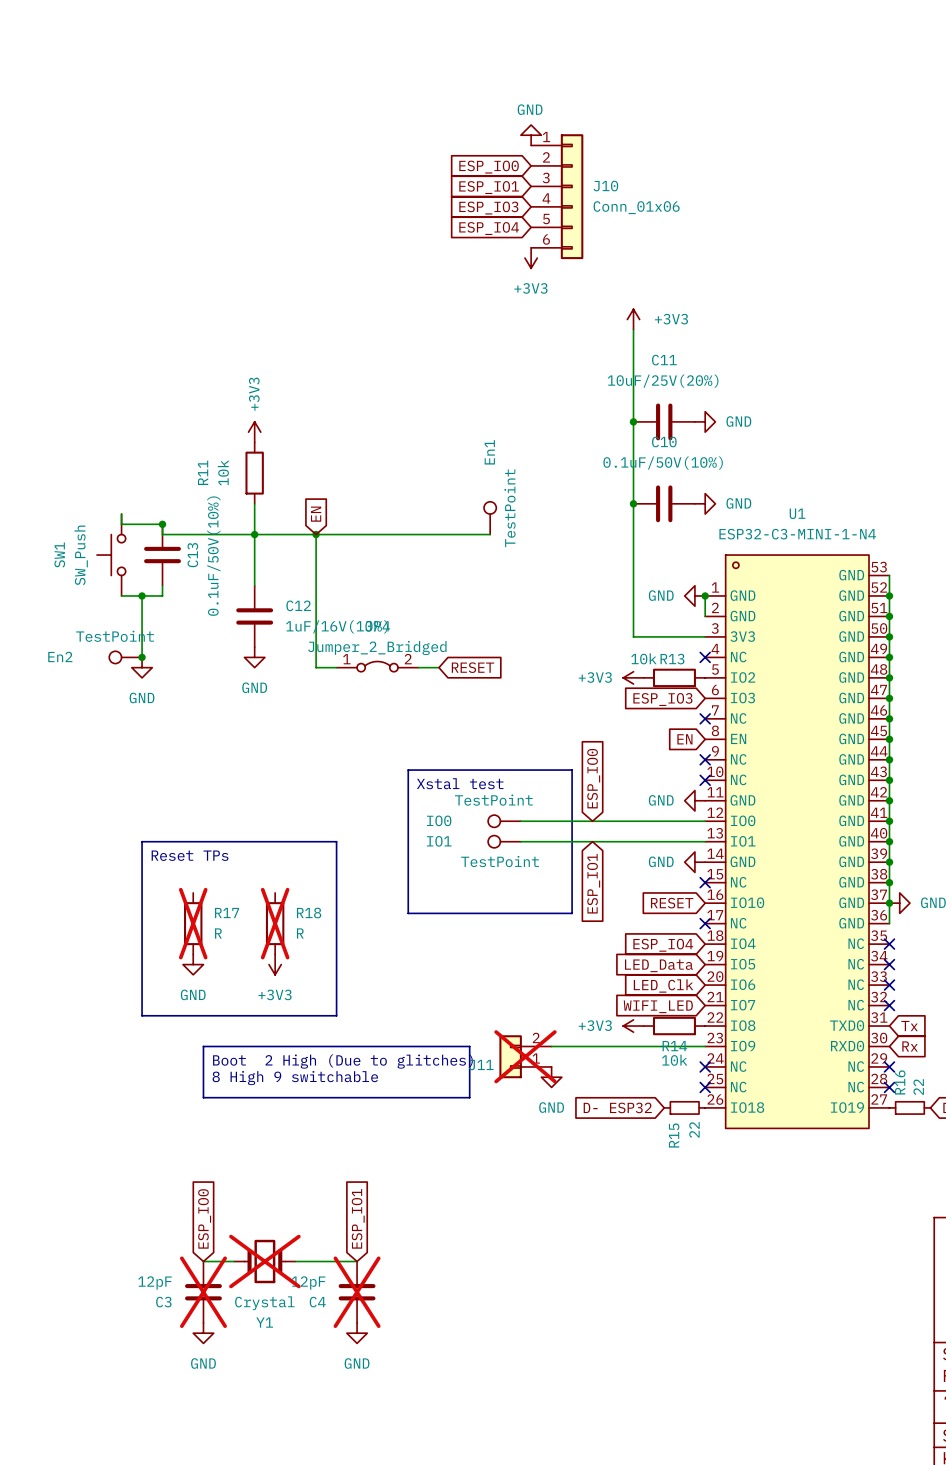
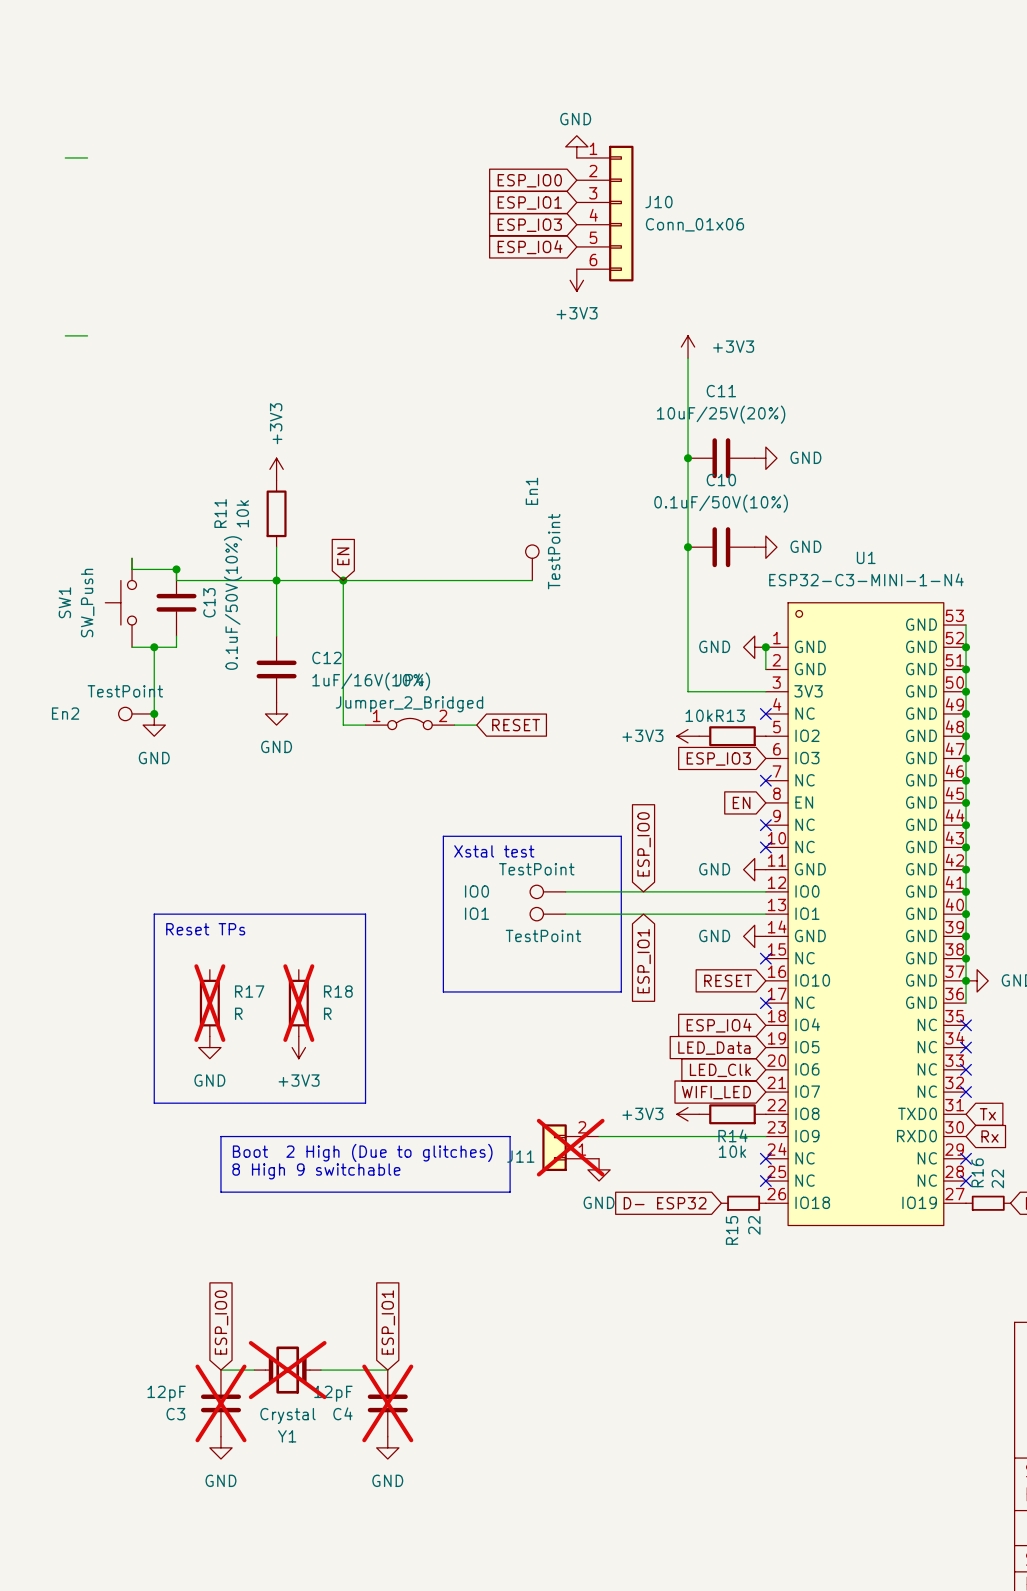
wire: none -> (65, 157) (87, 157)
wire: none -> (65, 335) (87, 335)

